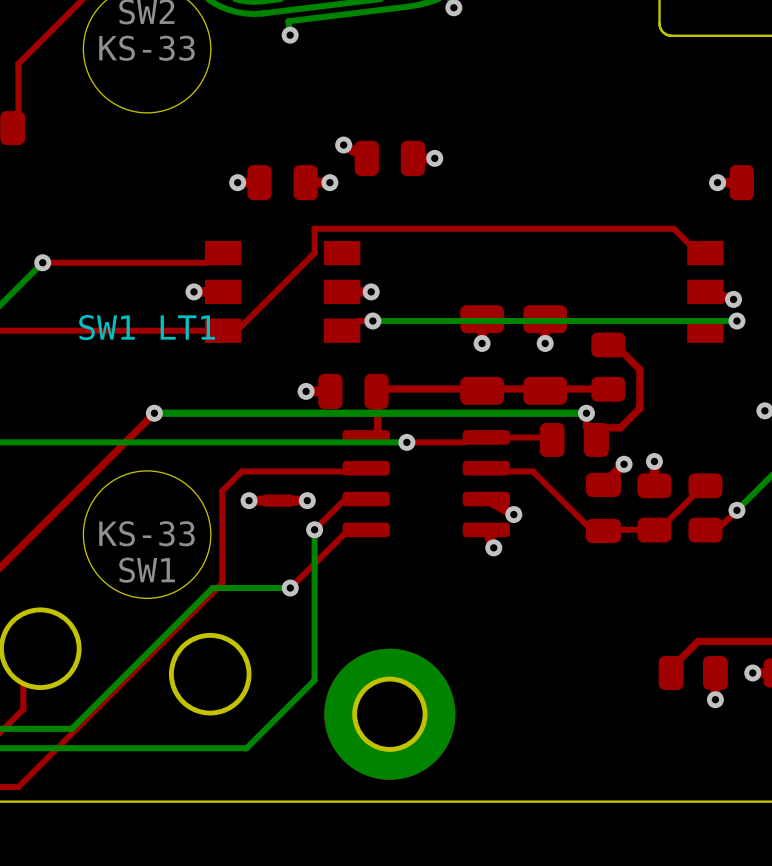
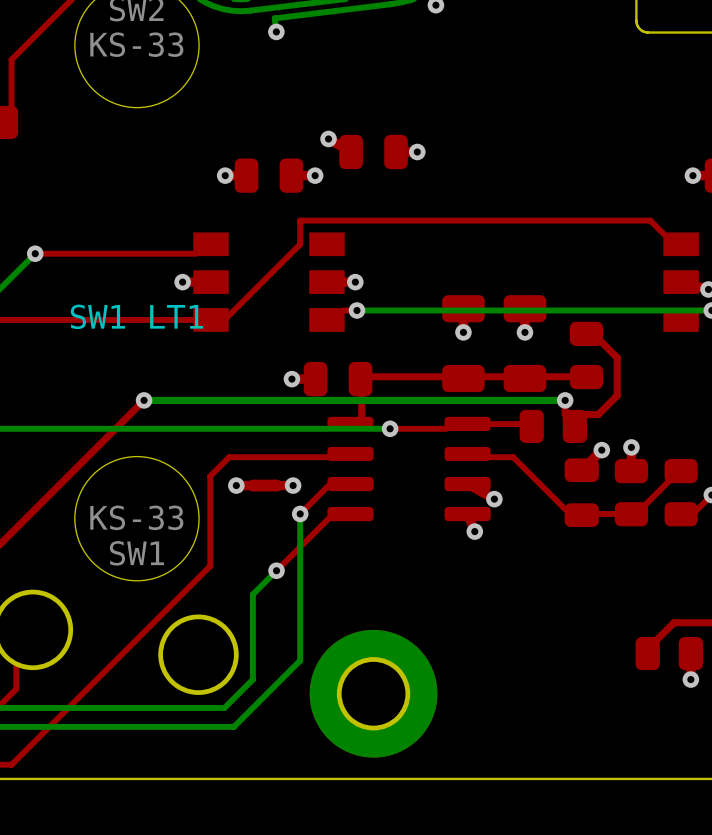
bottom track: (290, 588) (212, 588) (71, 728) -> (276, 570) (252, 594) (252, 679) (224, 707) (63, 707)

